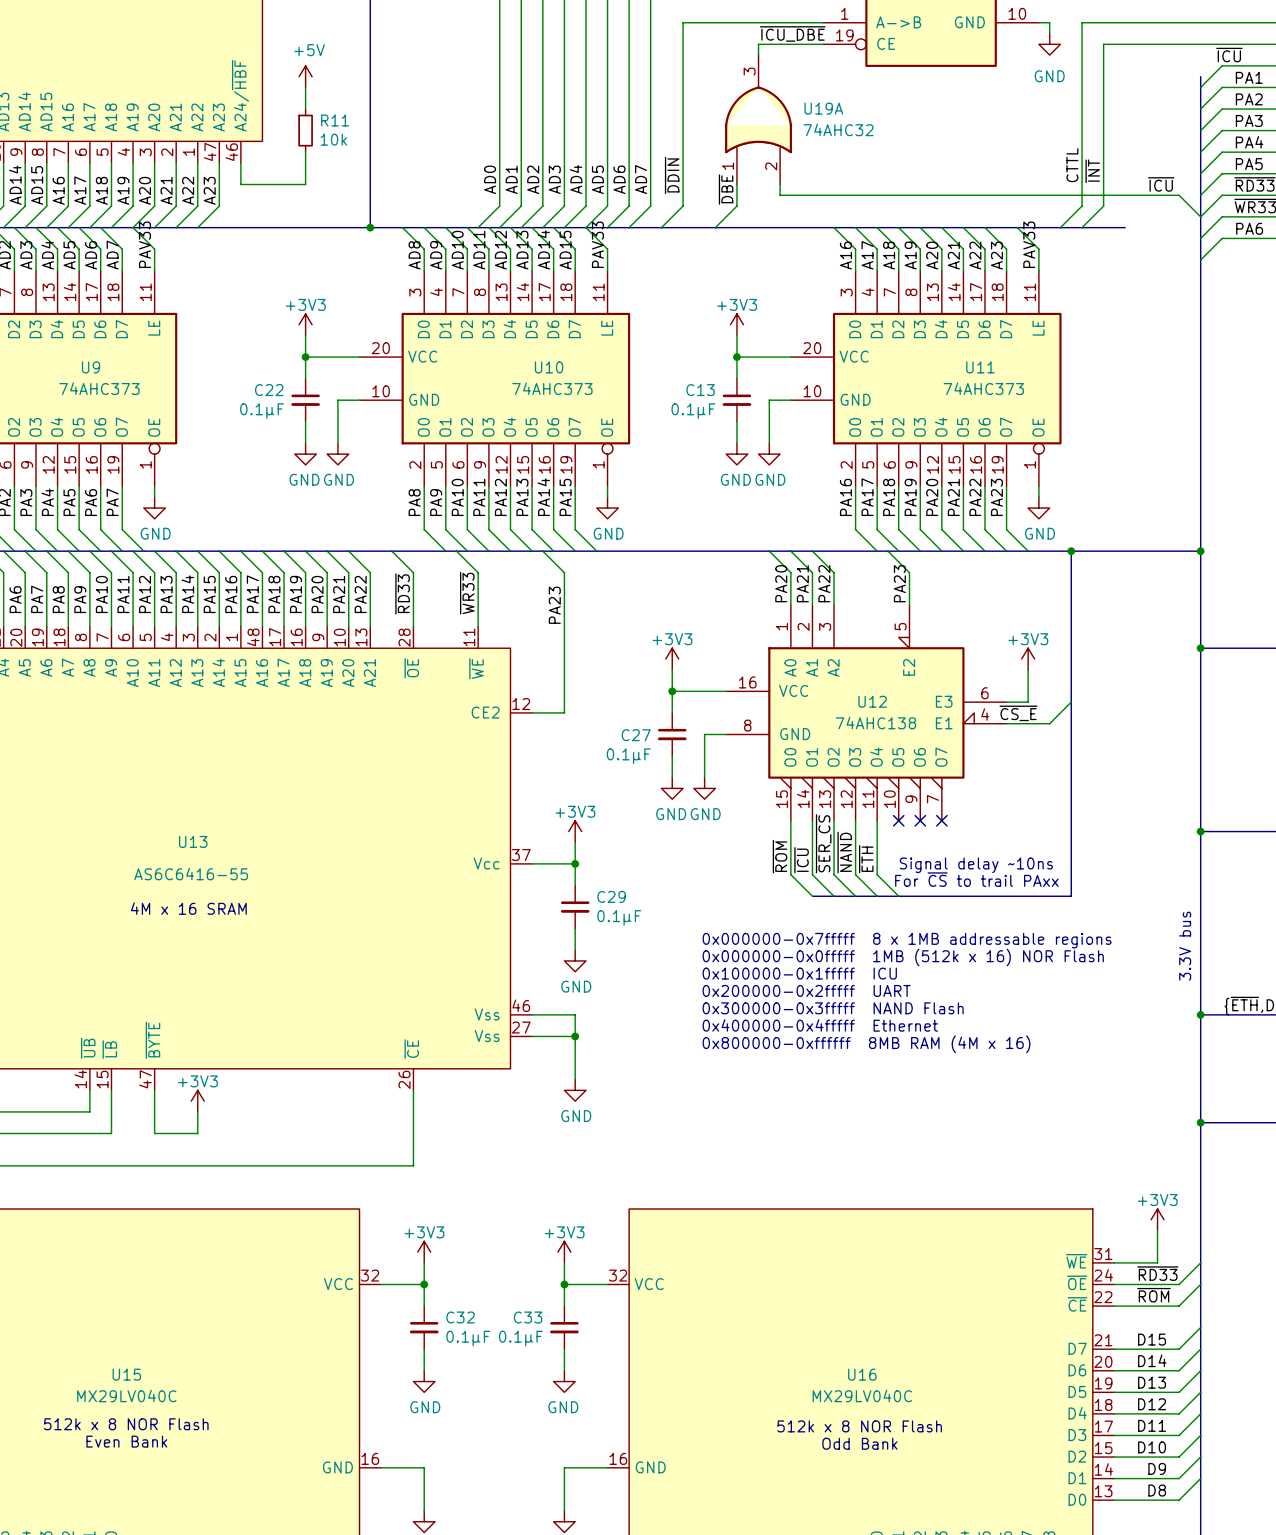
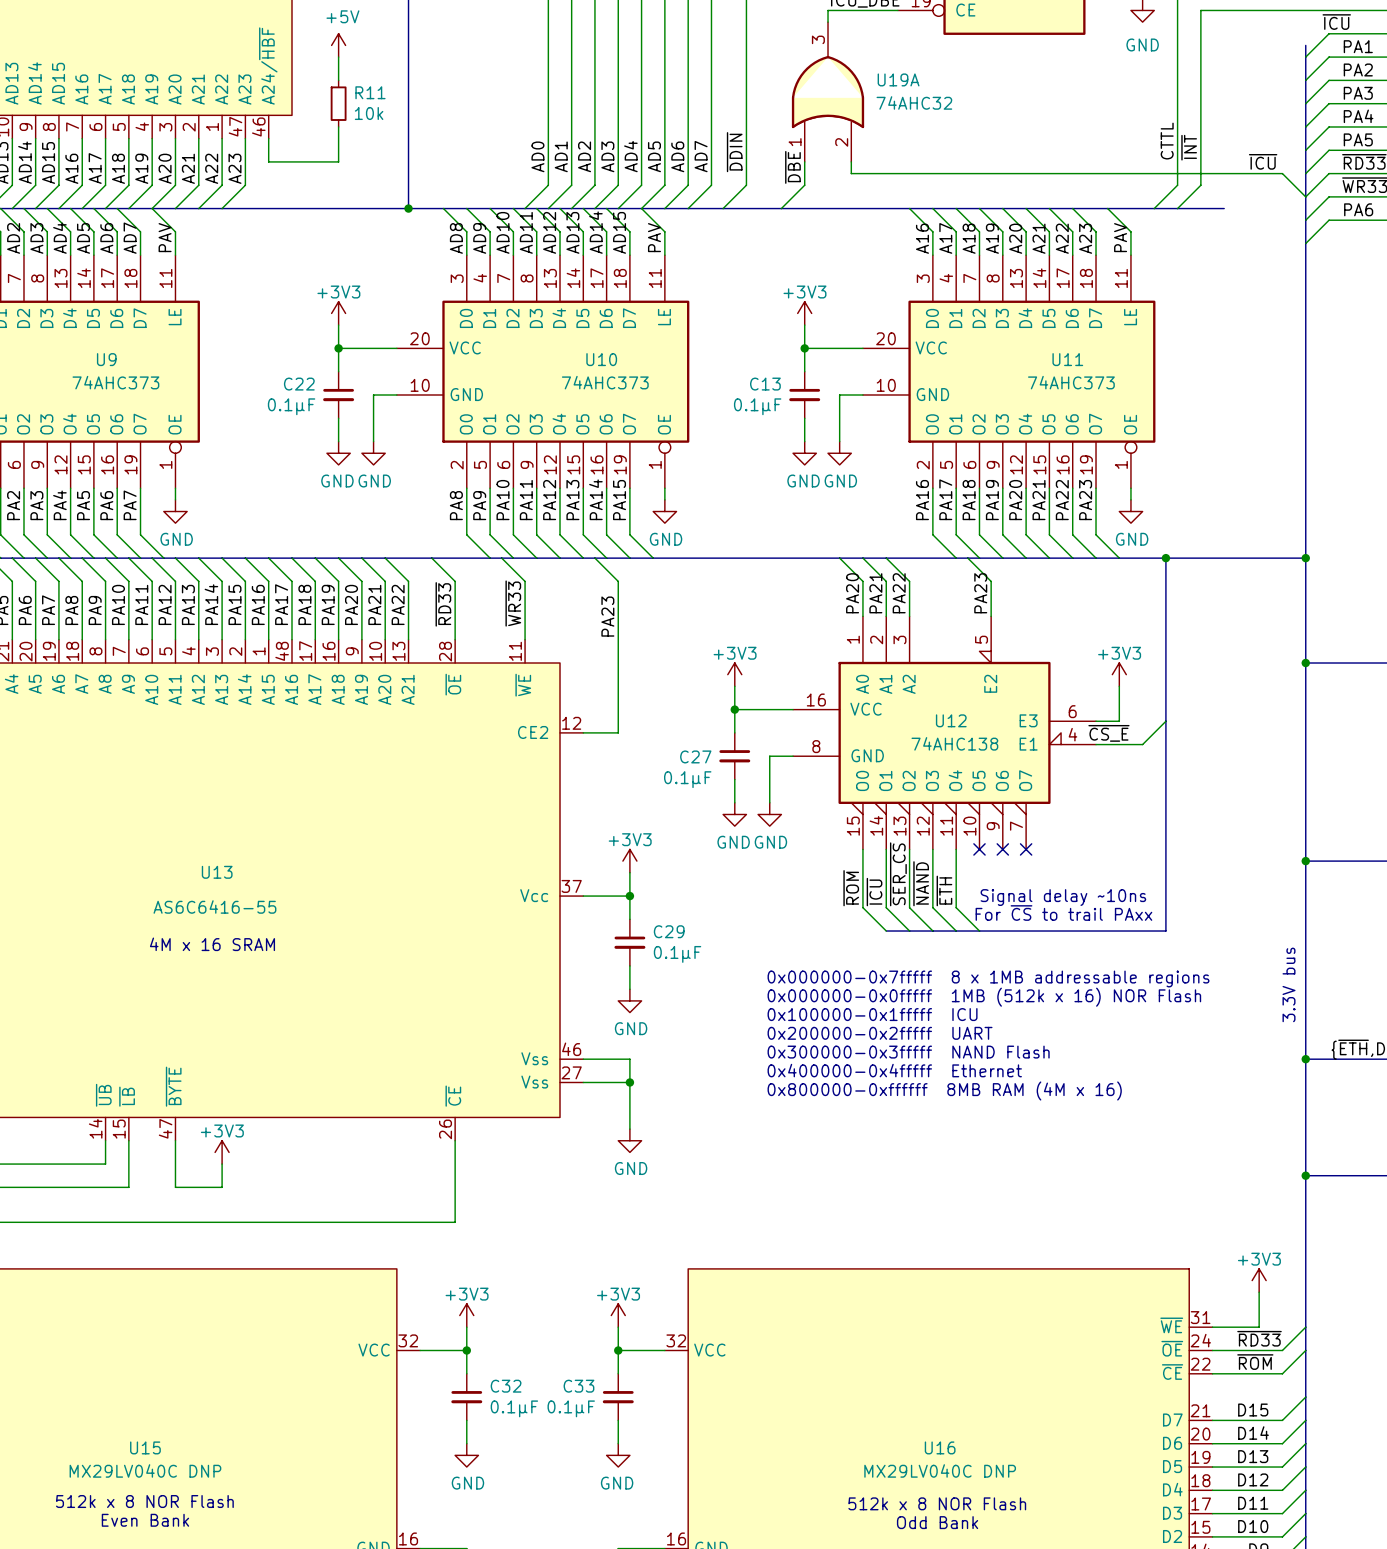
label: PAV33 (144, 244) -> PAV (165, 237)
label: PAV33 (597, 244) -> PAV (654, 237)
label: PAV33 (1029, 244) -> PAV (1120, 237)
U15 value: MX29LV040C (126, 1395) -> MX29LV040C DNP (145, 1470)
U16 value: MX29LV040C (862, 1395) -> MX29LV040C DNP (940, 1470)

